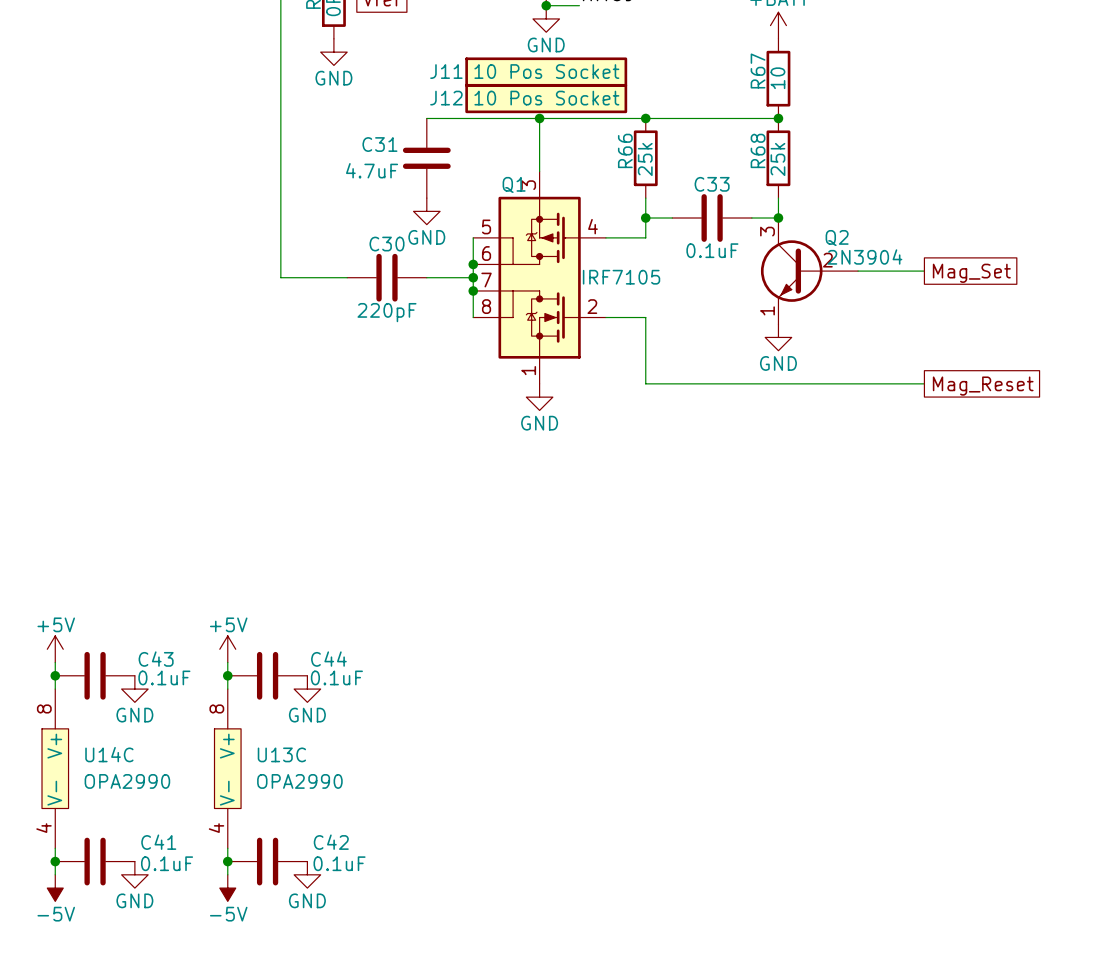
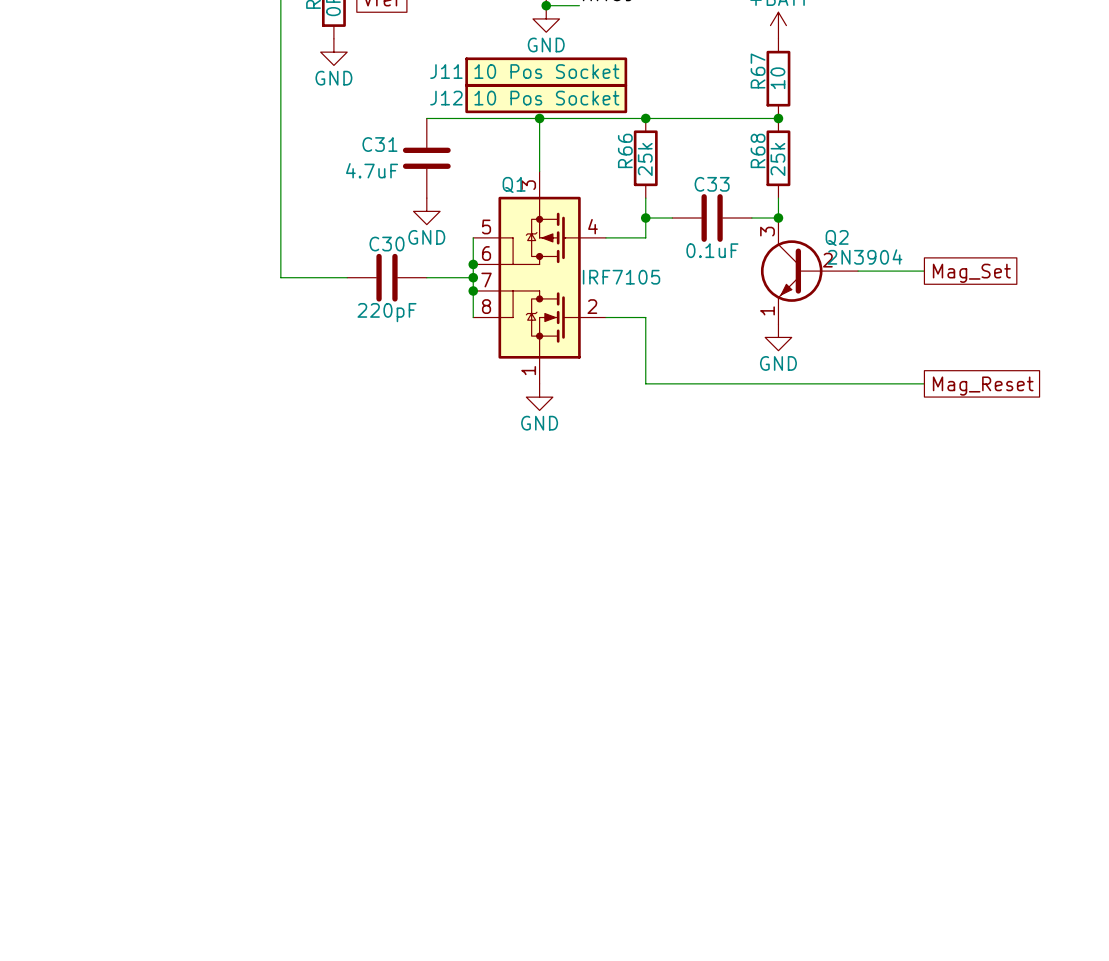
power symbol: +5V (55, 649) -> none
power symbol: +5V (227, 649) -> none
wire: (55, 662) (55, 689) -> none
wire: (227, 662) (227, 689) -> none
junction: (55, 675) -> none
C43: (95, 675) -> none
junction: (227, 675) -> none
C44: (267, 675) -> none
power symbol: GND (134, 689) -> none
power symbol: GND (307, 689) -> none
U14C: (55, 768) -> none
U13C: (227, 768) -> none
wire: (55, 848) (55, 874) -> none
wire: (227, 848) (227, 874) -> none
junction: (55, 861) -> none
C41: (95, 861) -> none
junction: (227, 861) -> none
C42: (267, 861) -> none
power symbol: GND (134, 874) -> none
power symbol: GND (307, 874) -> none
power symbol: -5V (55, 888) -> none
power symbol: -5V (227, 888) -> none

